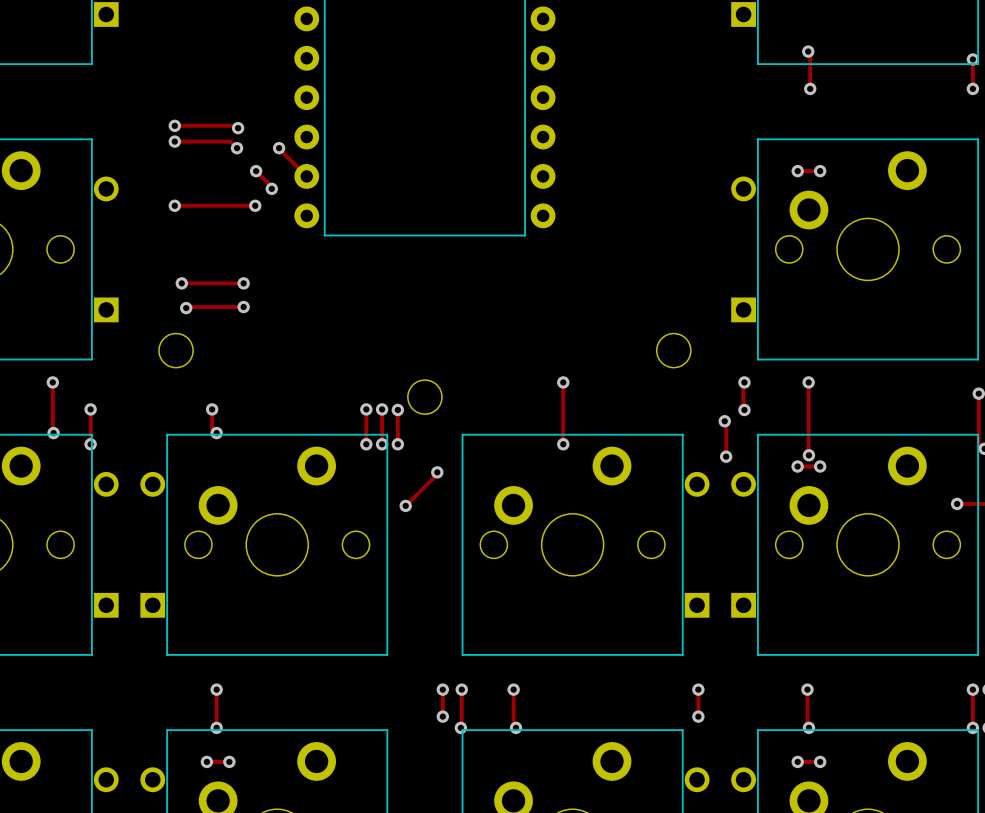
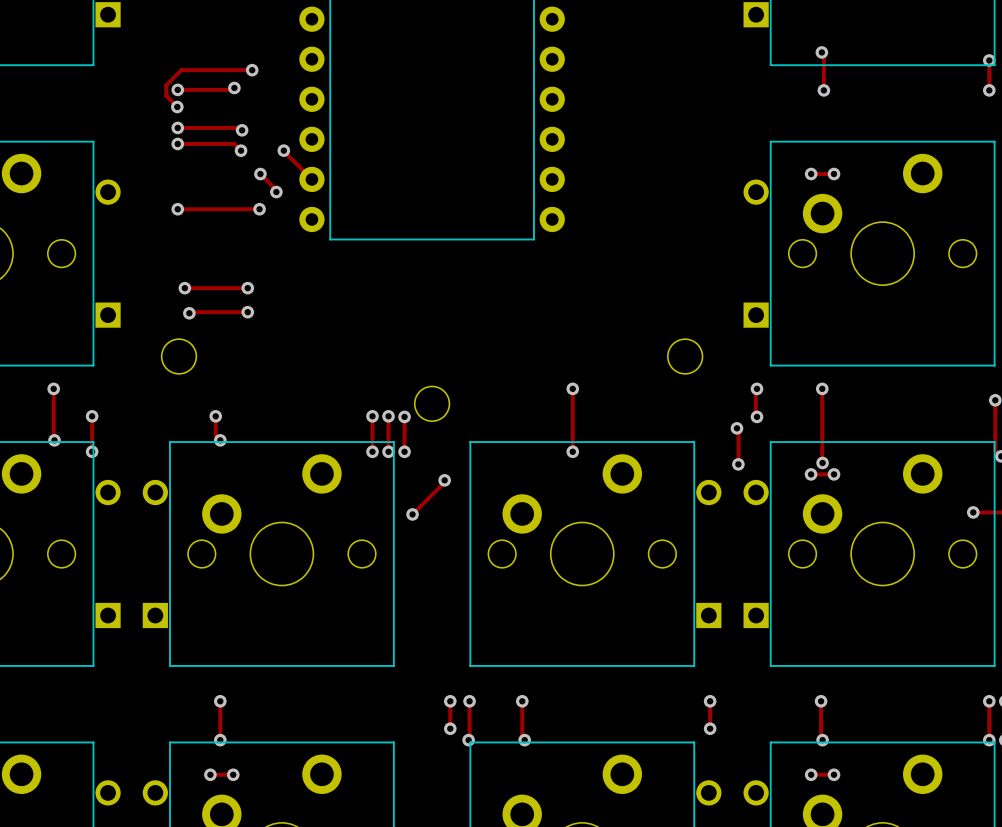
track: none -> (252, 70) (181, 70) (166, 85) (166, 95) (177, 106)
via: none -> (252, 70)
track: none -> (234, 87) (232, 89) (177, 89)
via: none -> (234, 87)
via: none -> (177, 89)
via: none -> (177, 106)

